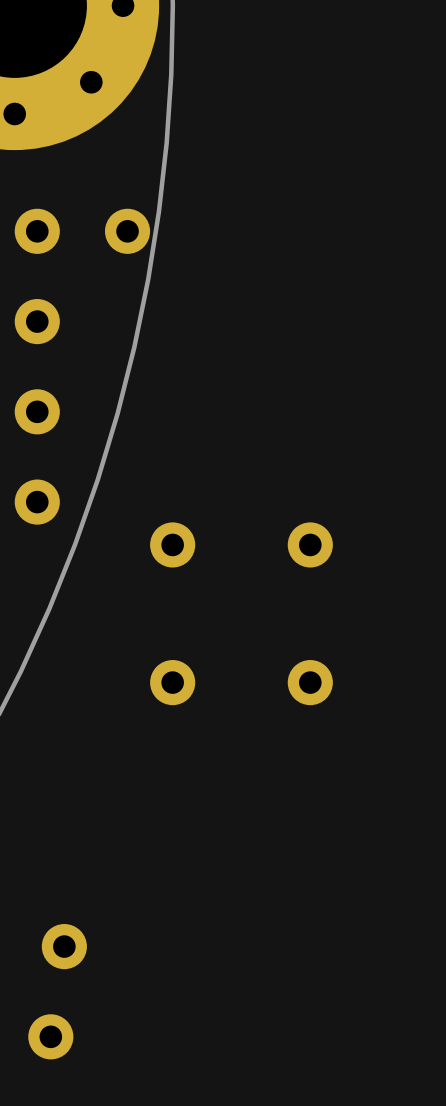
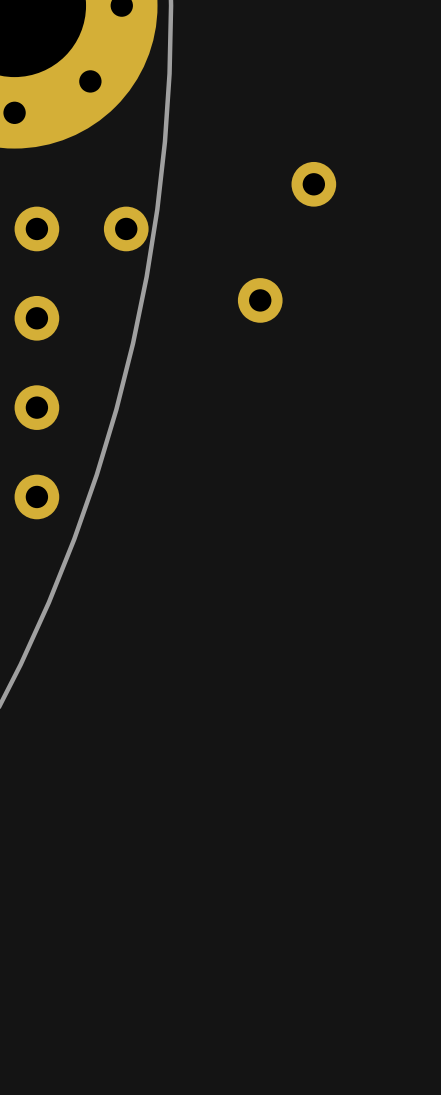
part: none -> (313, 184)
part: none -> (260, 300)
part: (172, 544) -> none
part: (310, 544) -> none
part: (172, 682) -> none
part: (310, 682) -> none
part: (64, 946) -> none
part: (50, 1036) -> none

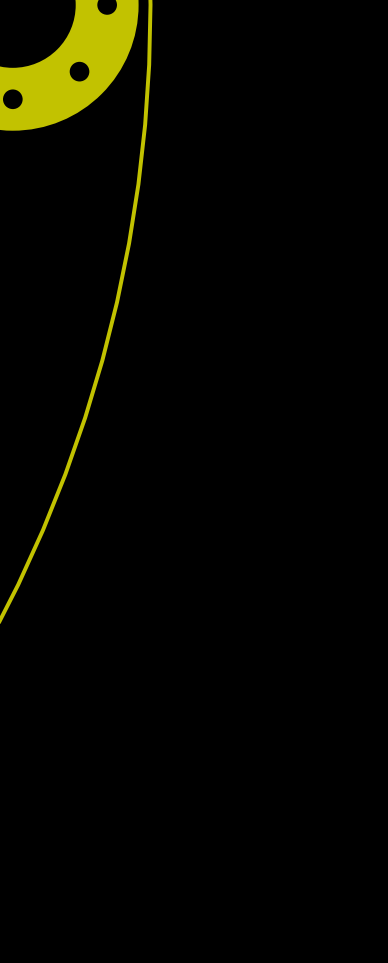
part: (313, 184) -> none
part: (36, 228) -> none
part: (126, 228) -> none
part: (260, 300) -> none
part: (36, 318) -> none
part: (36, 407) -> none
part: (36, 496) -> none

